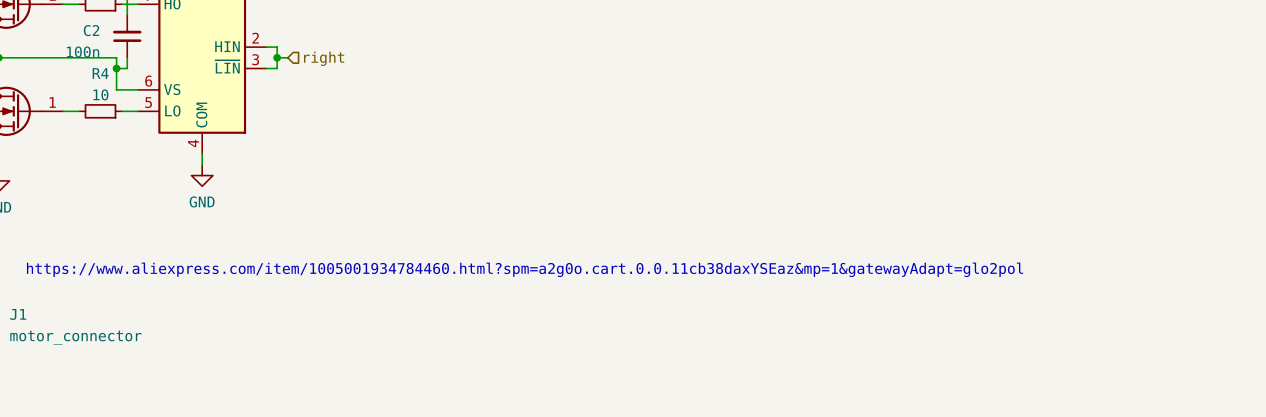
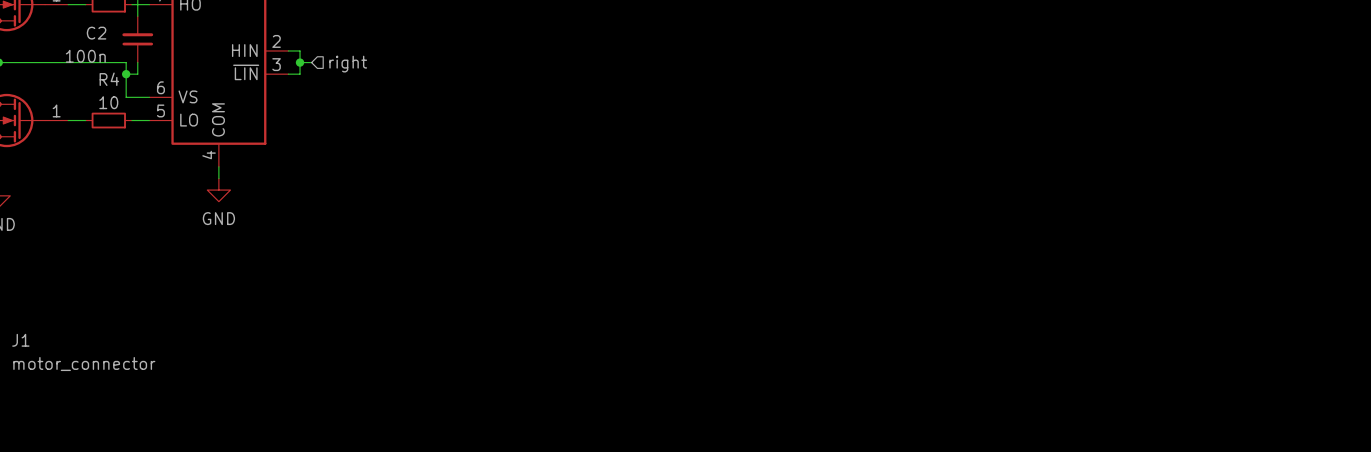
text: https://www.aliexpress.com/item/1005001934784460.html?spm=a2g0o.cart.0.0.11cb38daxYSEaz&mp=1&gatewayAdapt=glo2pol (525, 269) -> none

